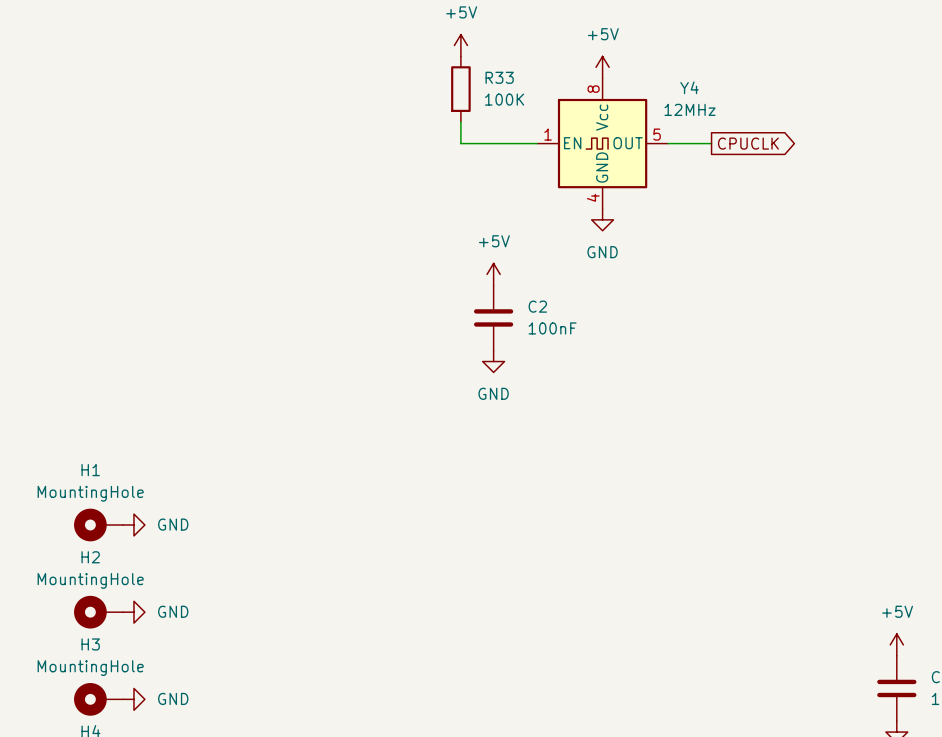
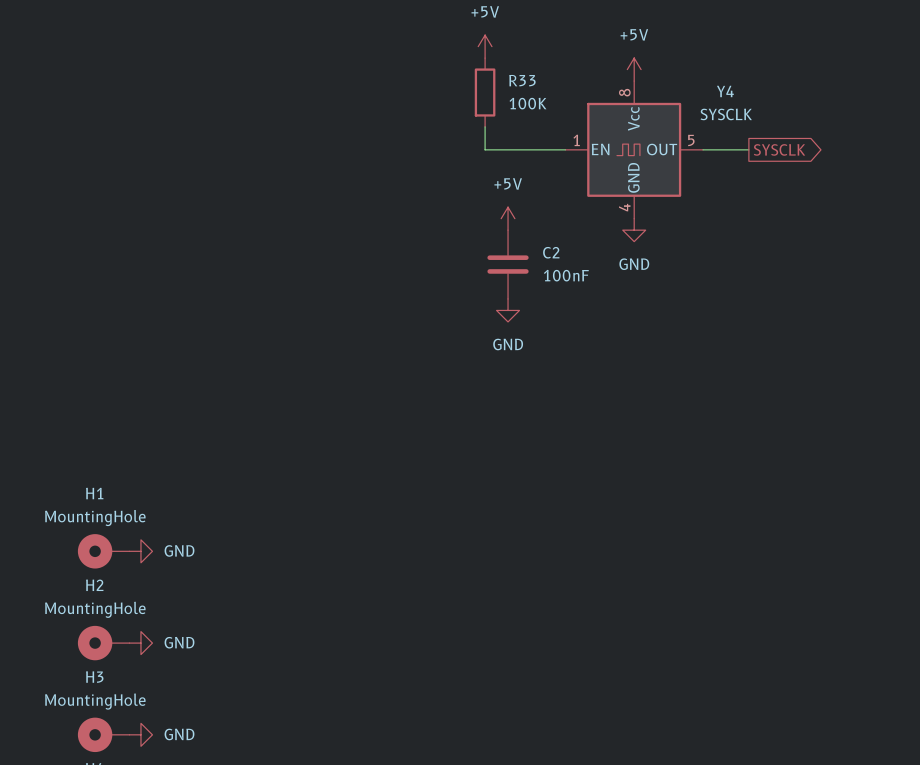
Y4 value: 12MHz (690, 109) -> SYSCLK (726, 114)
global label: CPUCLK (748, 143) -> SYSCLK (779, 149)
power symbol position: +5V (493, 274) -> +5V (508, 218)
C2 position: (493, 317) -> (508, 264)
power symbol position: GND (493, 361) -> GND (508, 310)

